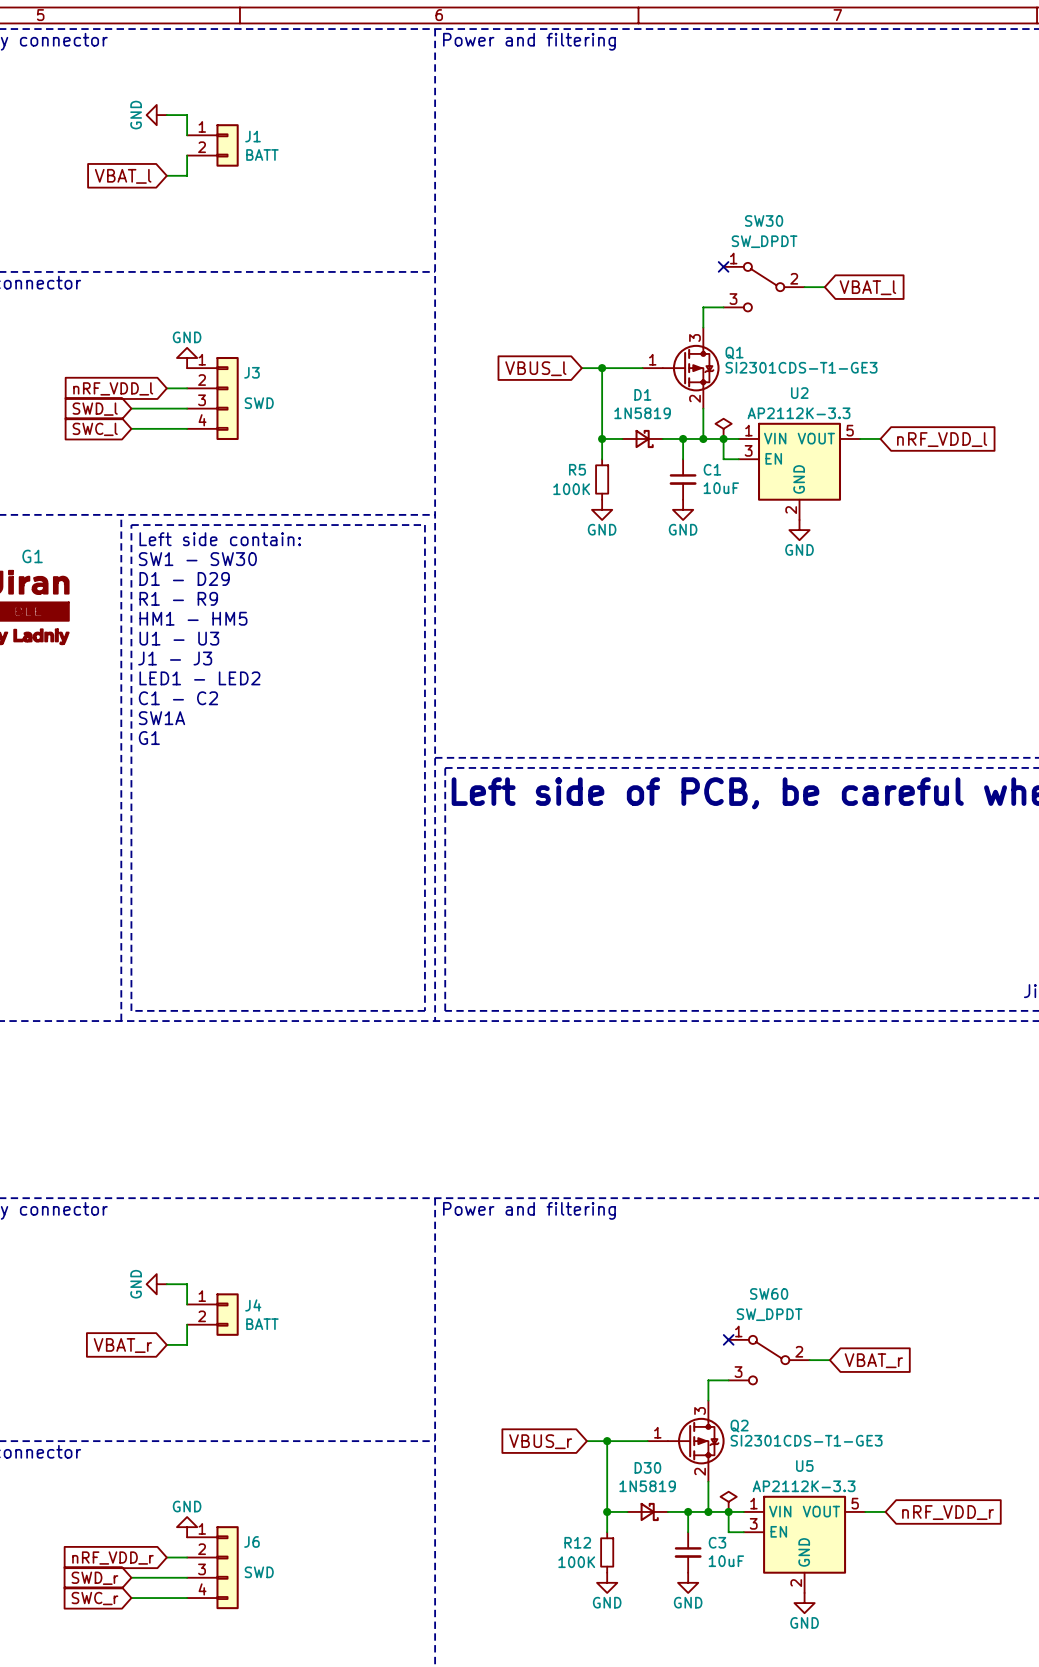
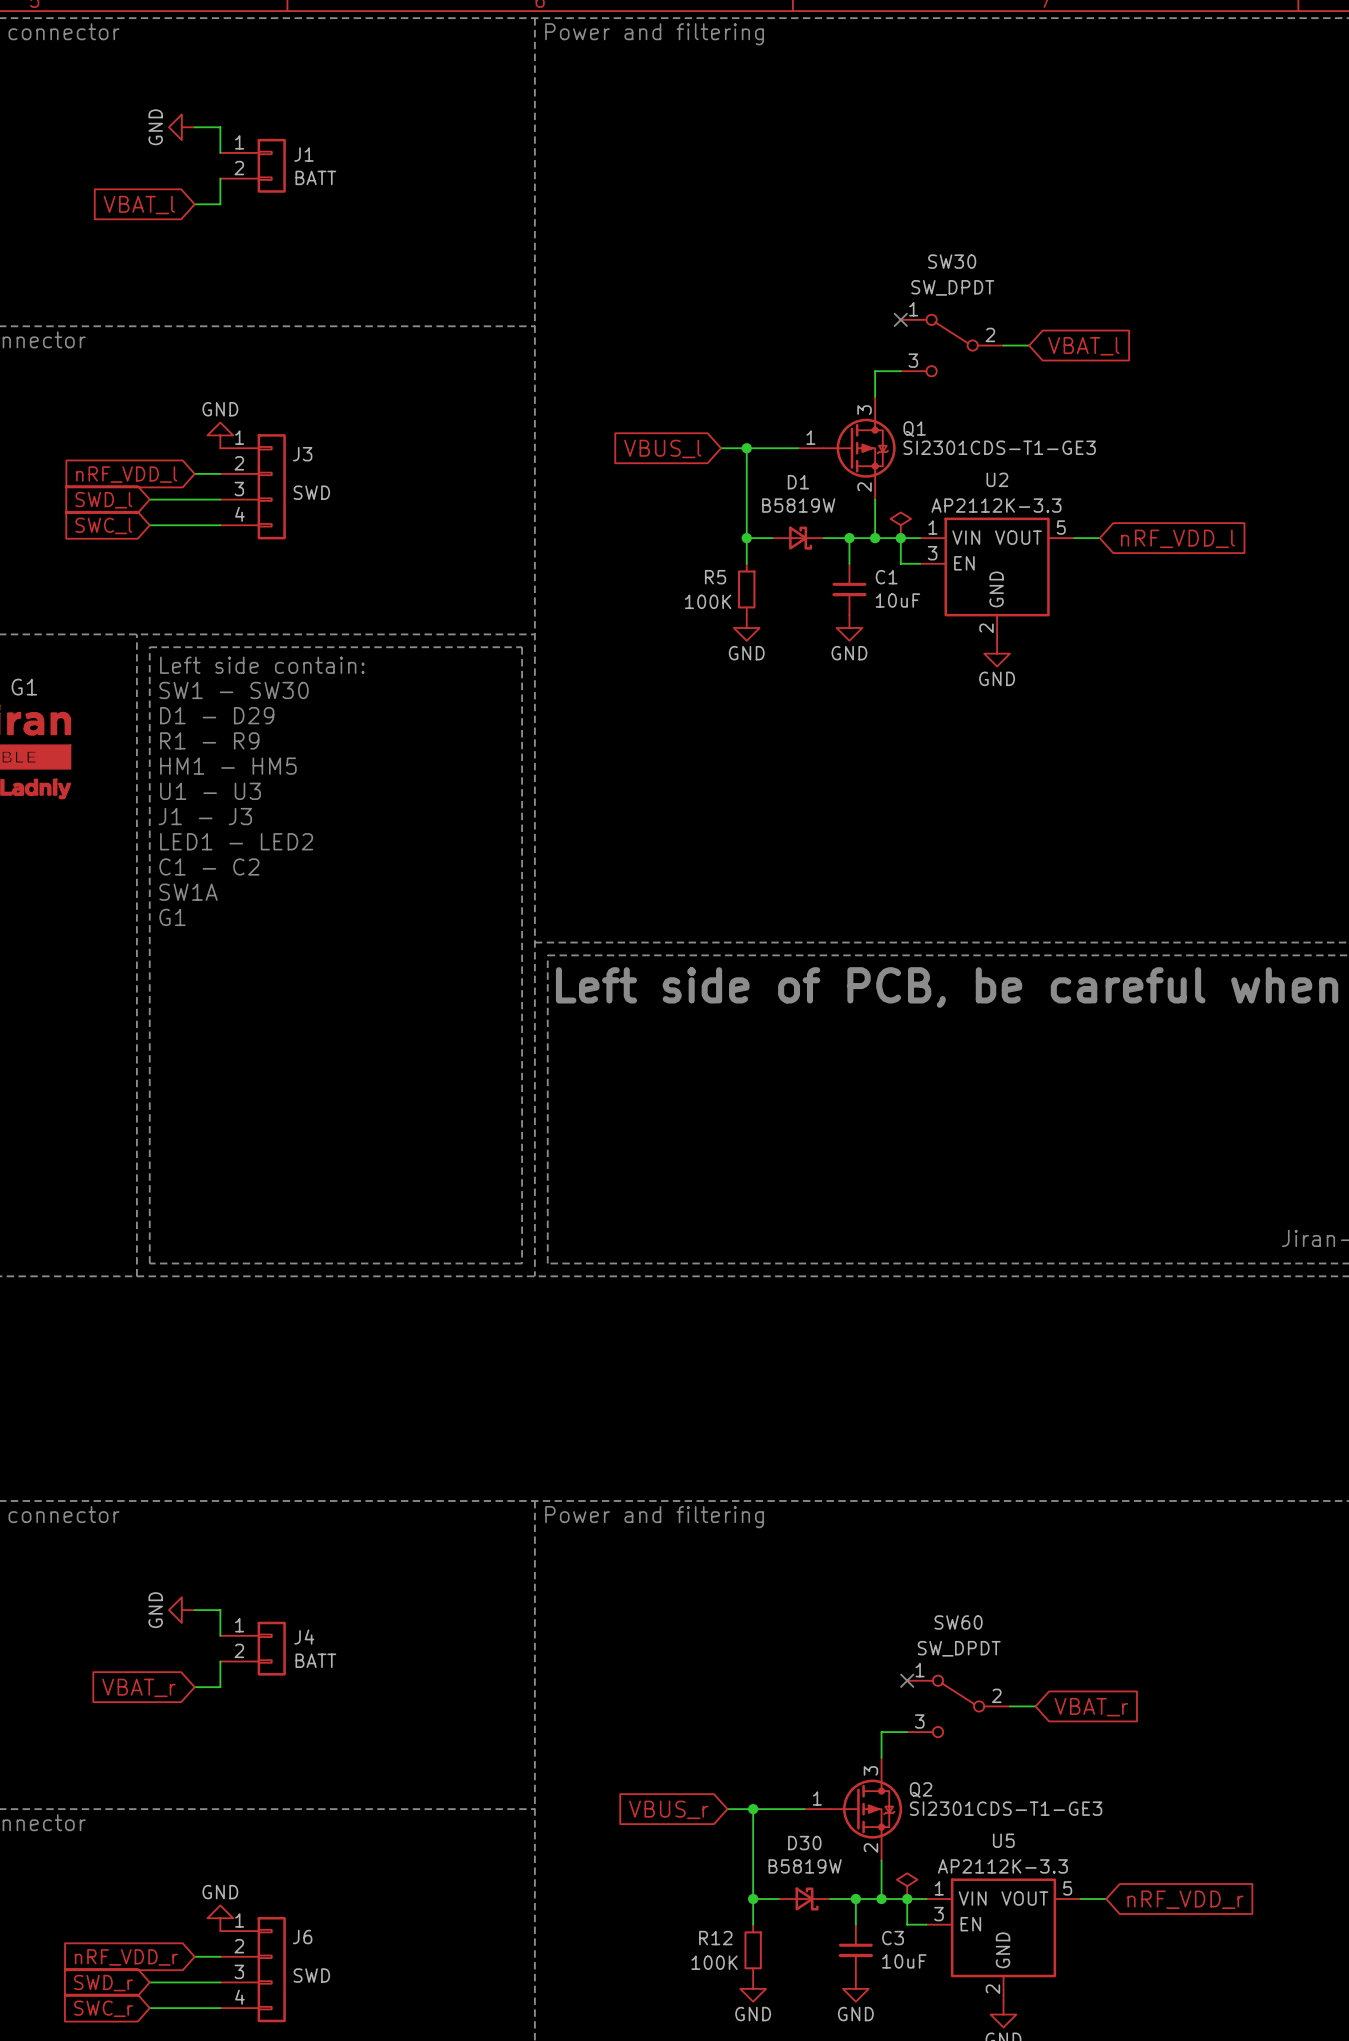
D1 value: 1N5819 (642, 413) -> B5819W (798, 505)
D30 value: 1N5819 (647, 1486) -> B5819W (805, 1866)

